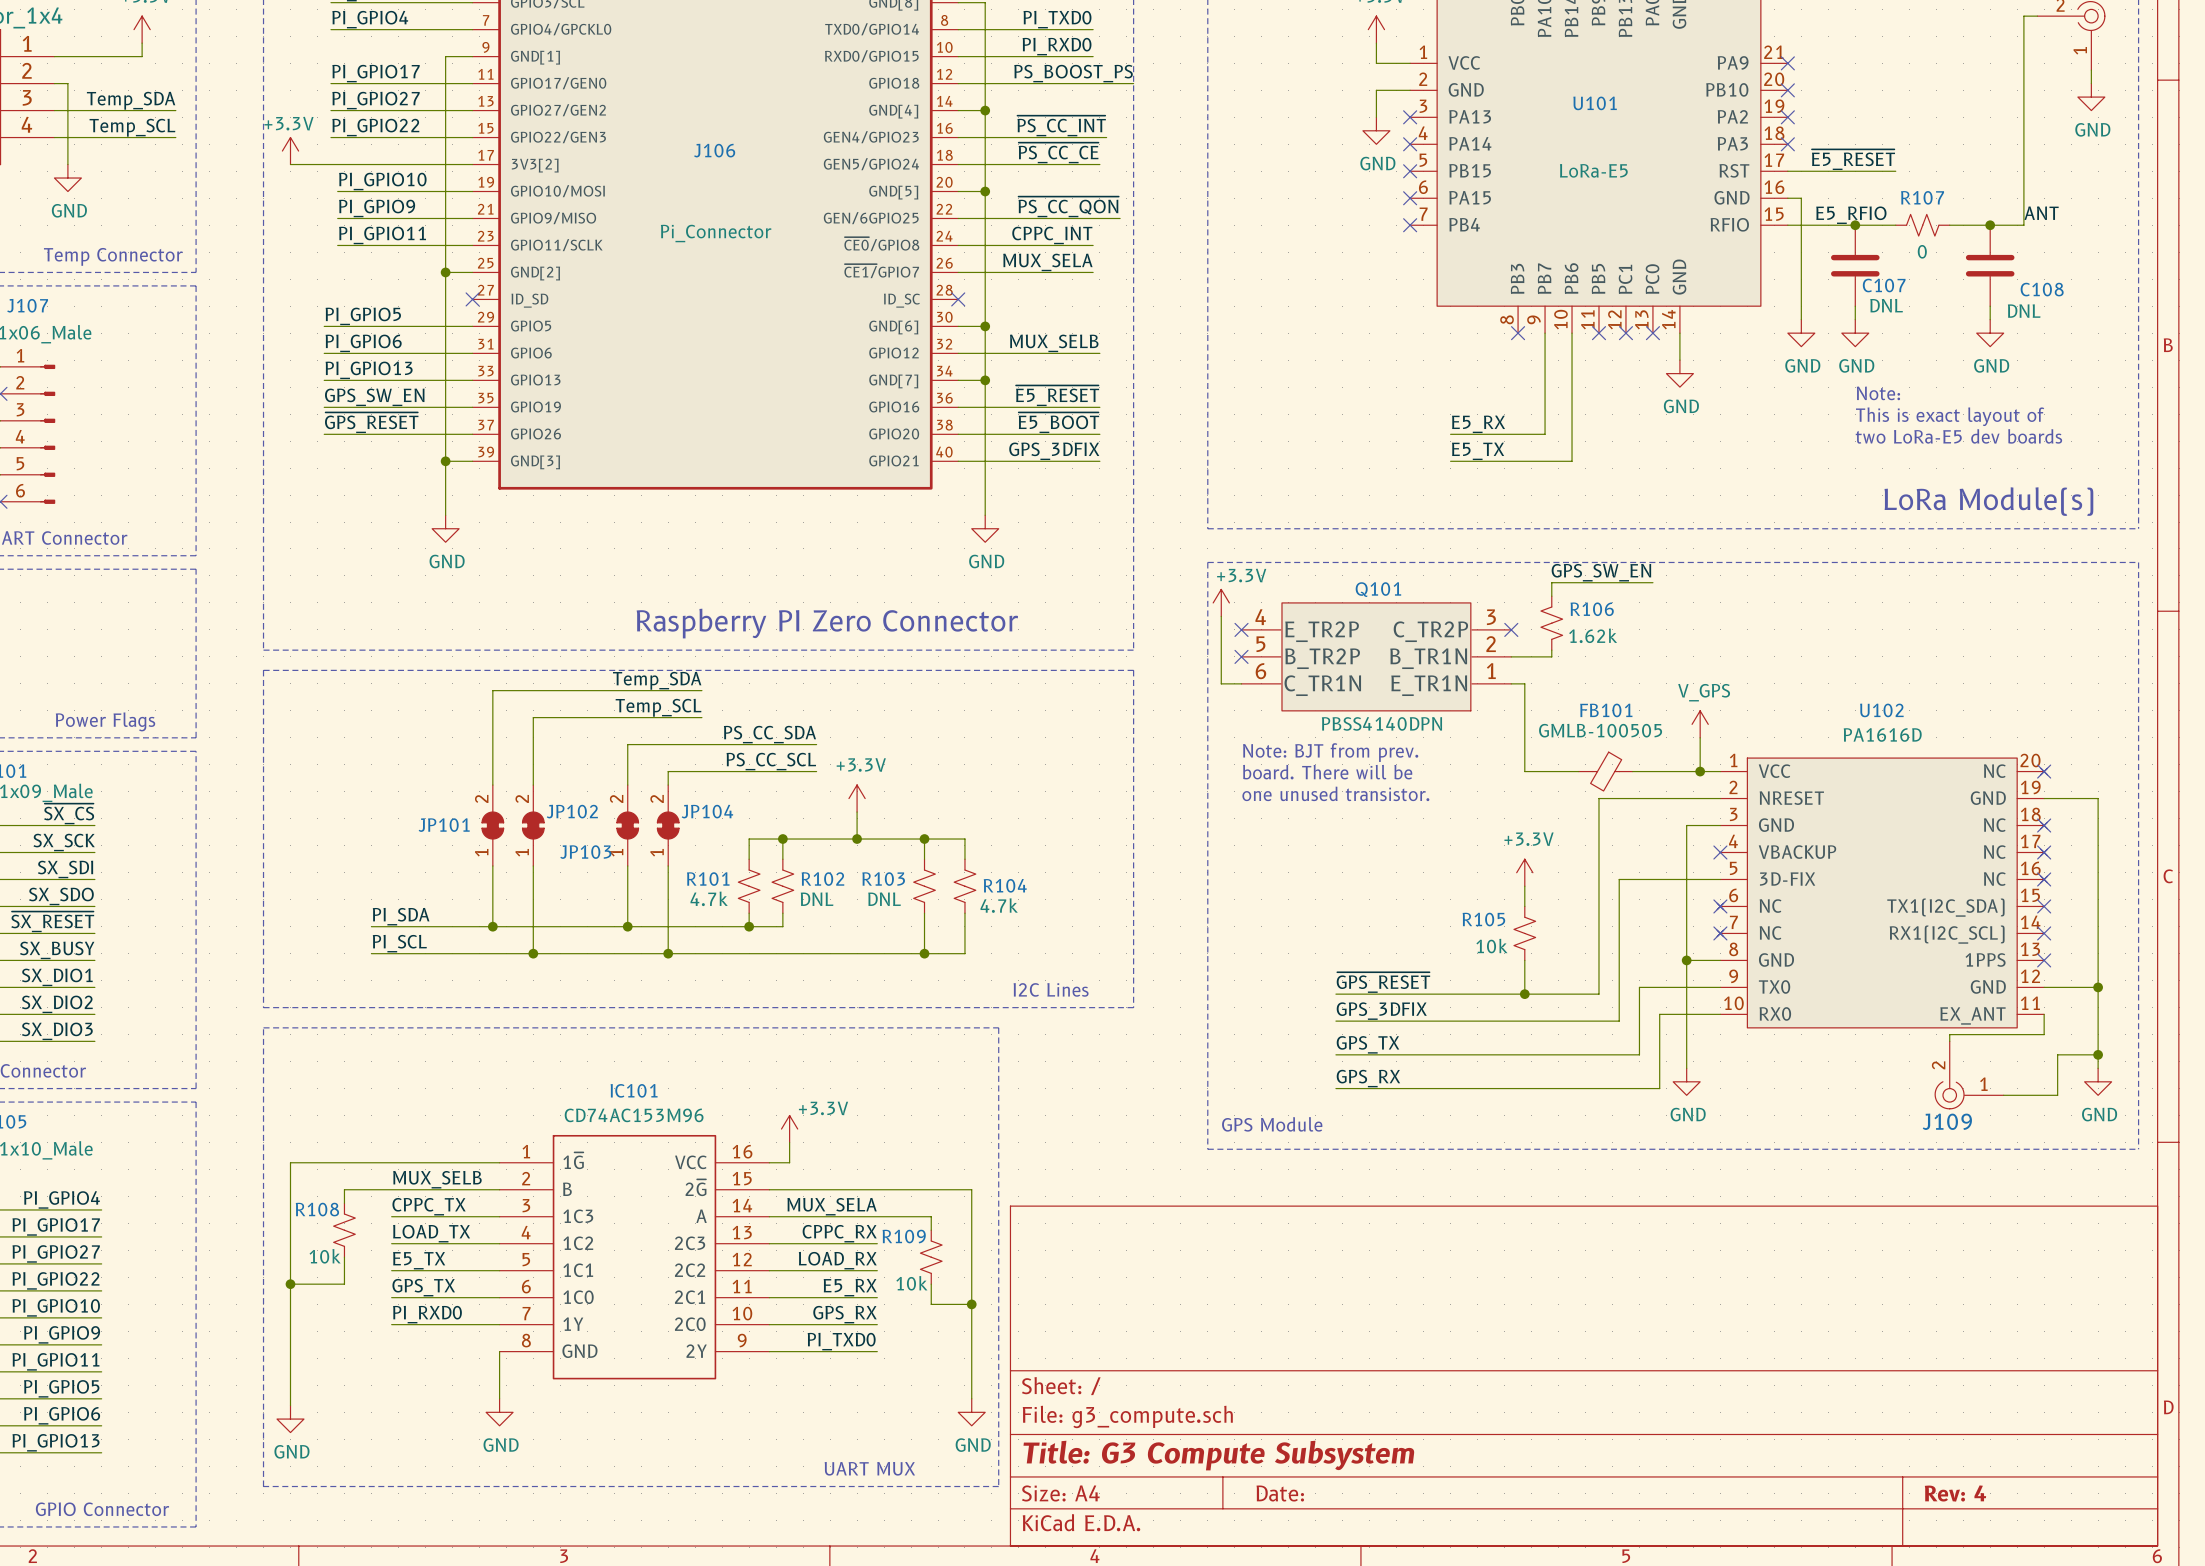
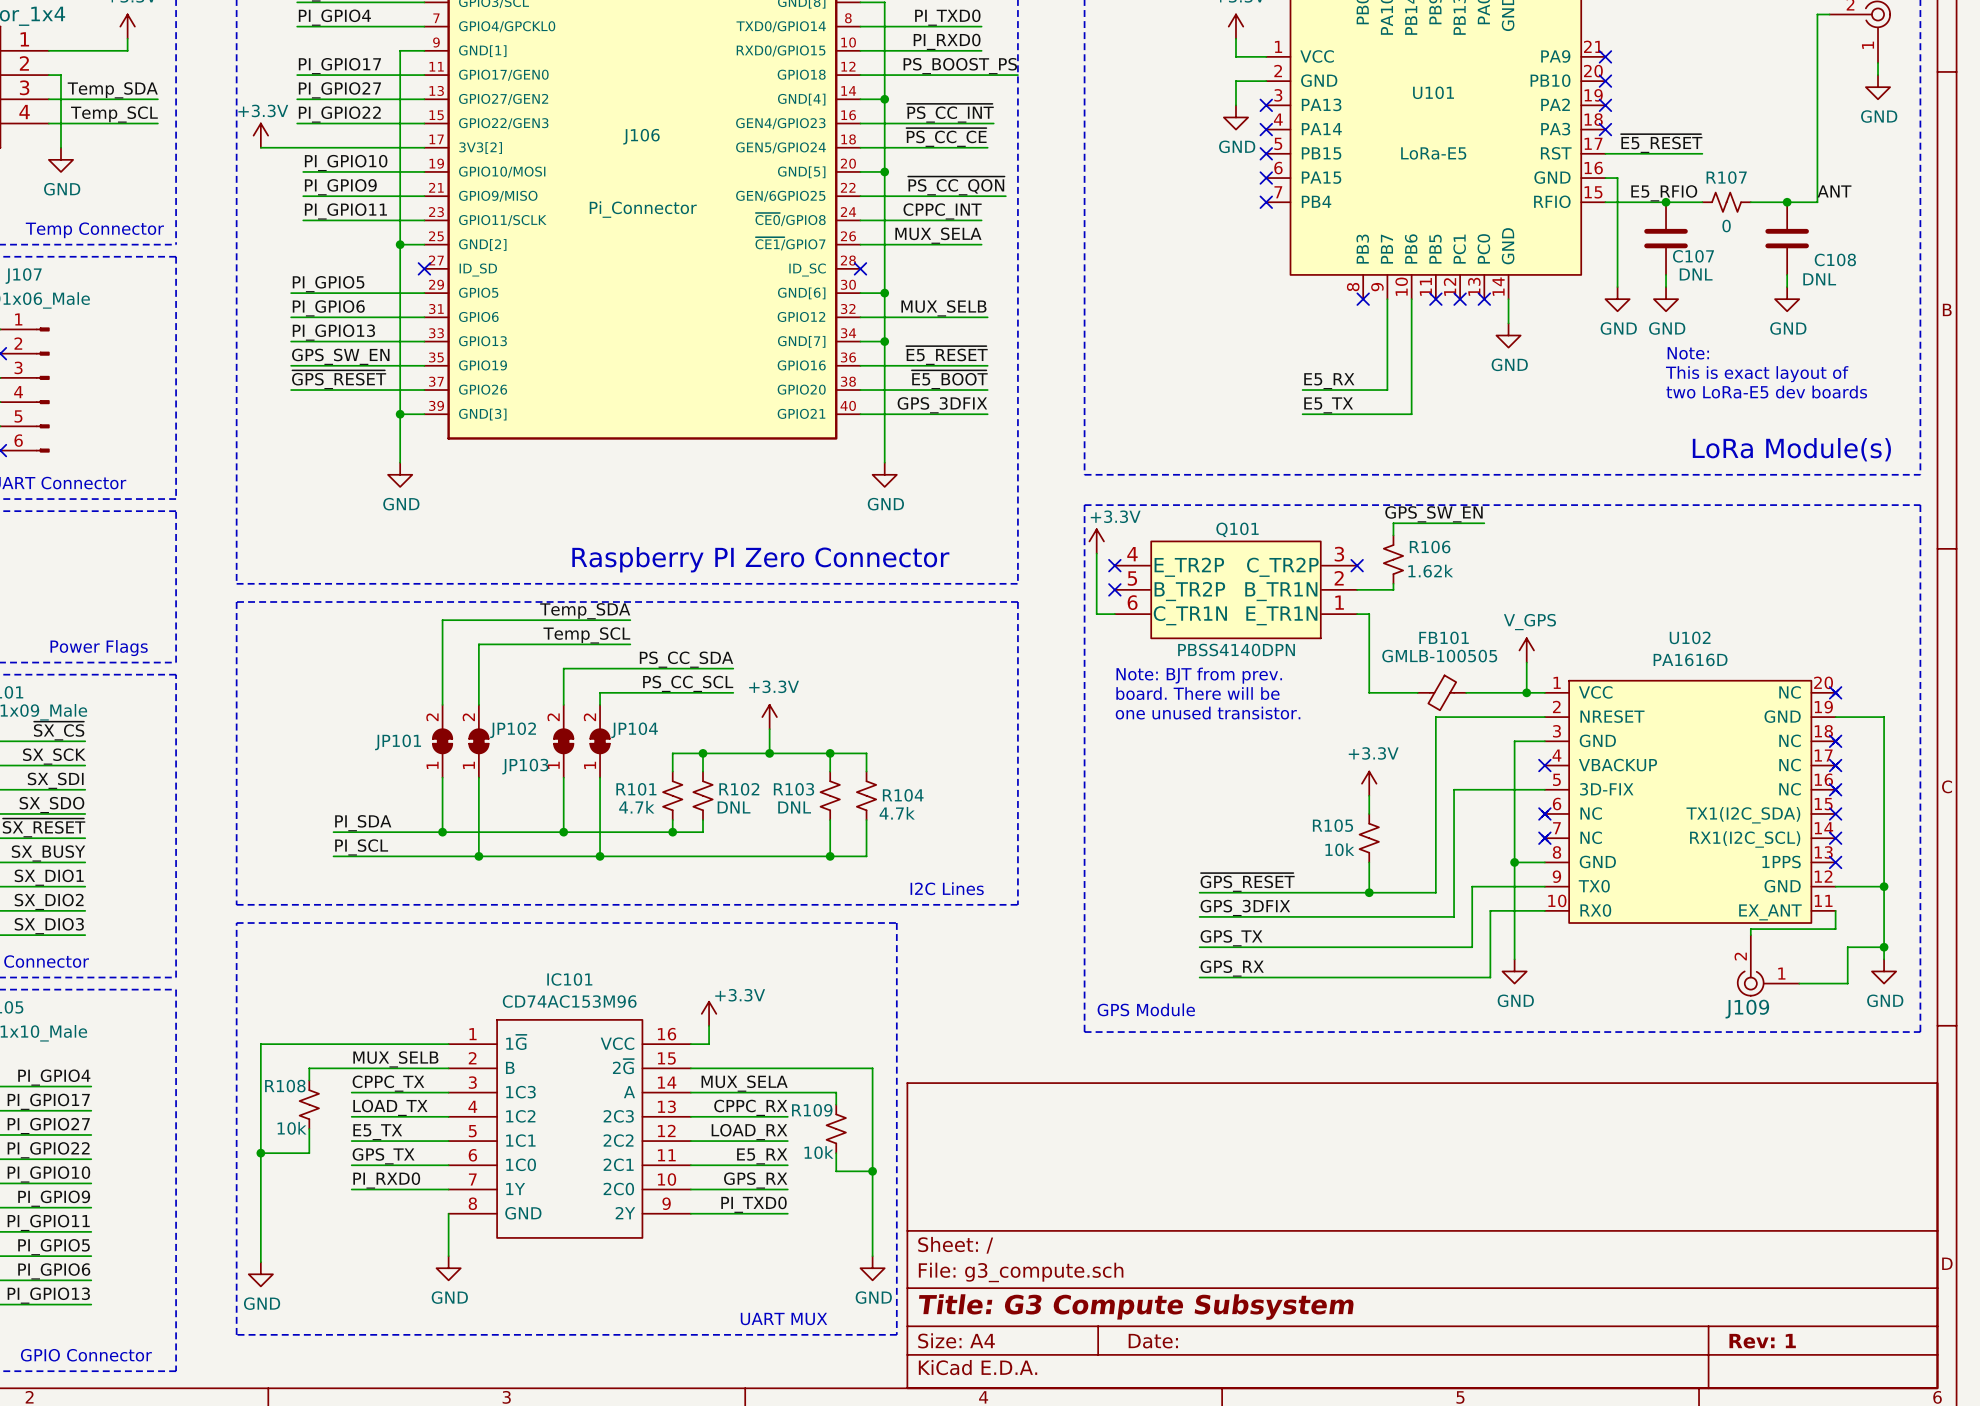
title block: Rev: 4 (1955, 1493) -> Rev: 1 (1762, 1341)

